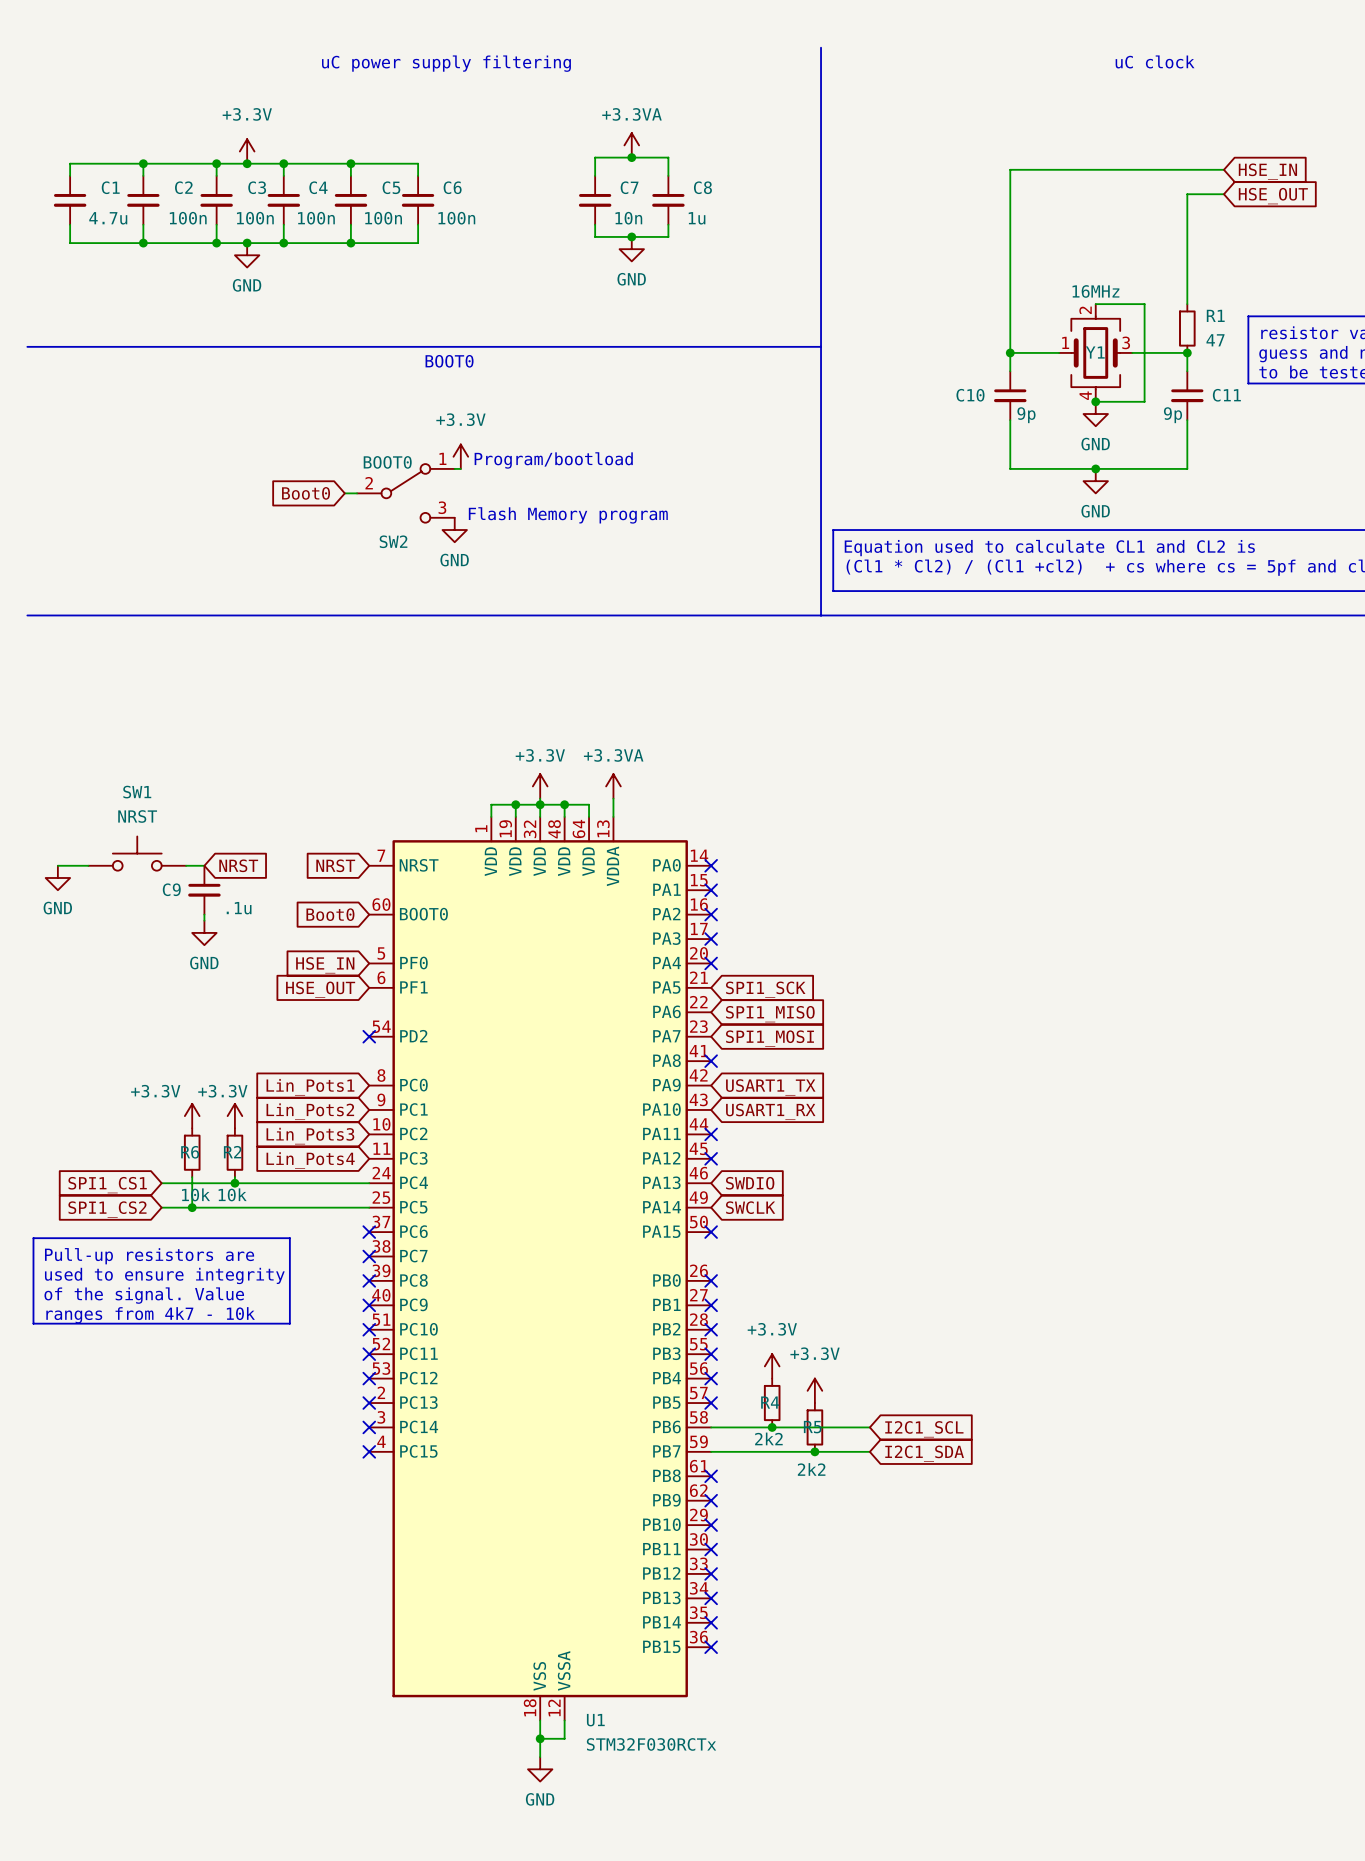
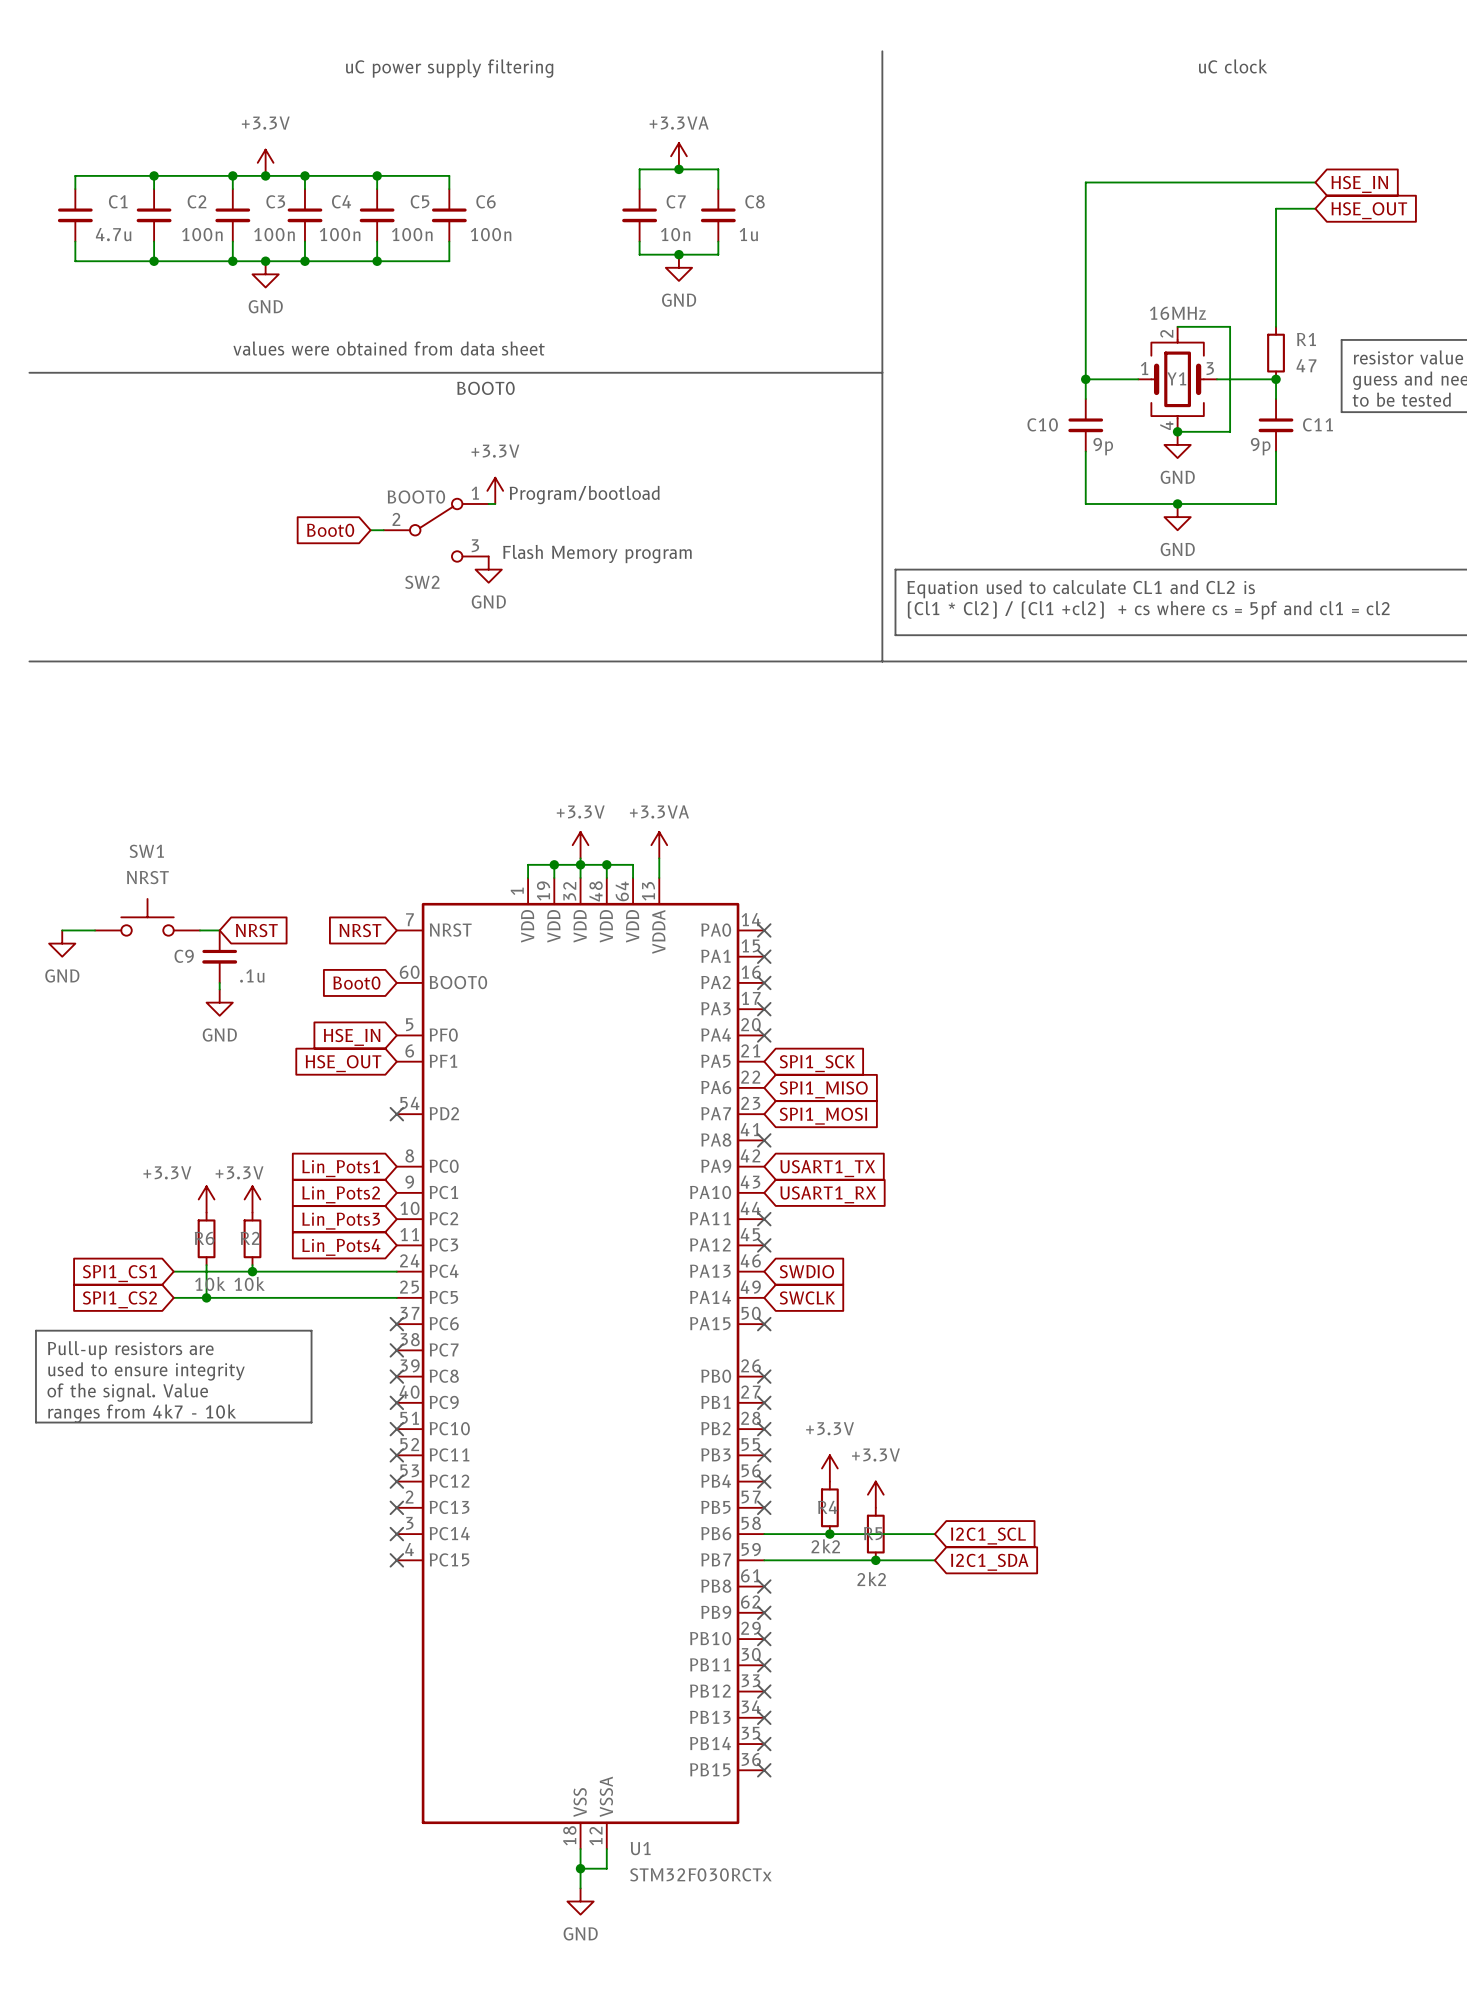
text: none -> values were obtained from data sheet (389, 348)

